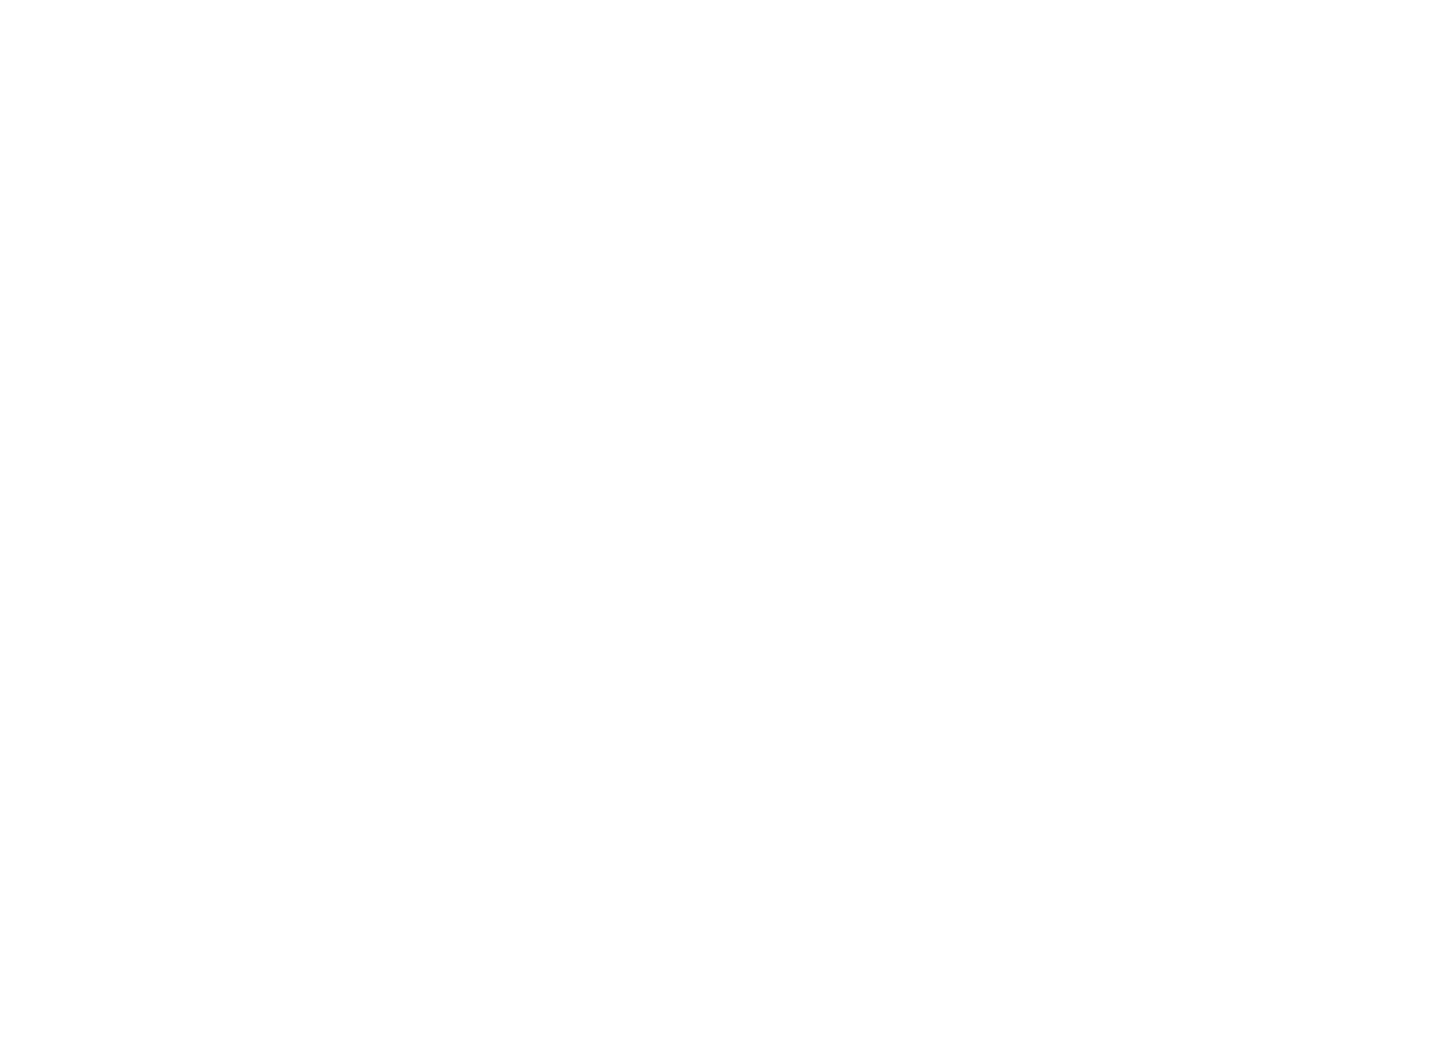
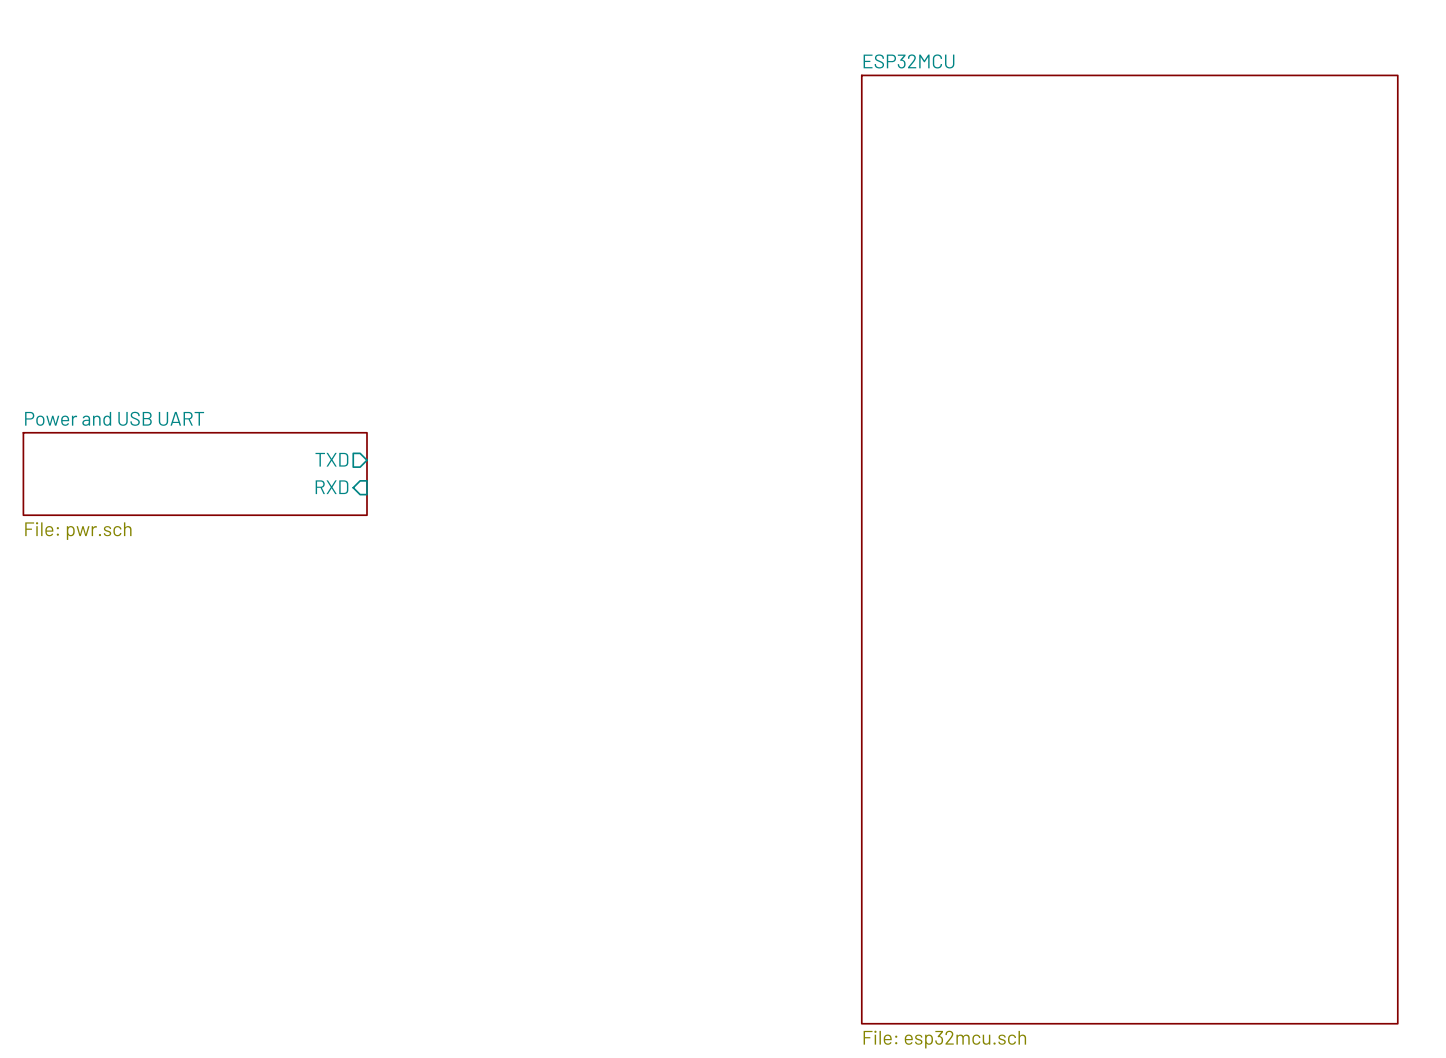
sheet pin: none -> TXD (331, 459)
sheet Power and USB UART: none -> File: pwr.sch (195, 473)
sheet pin: none -> RXD (332, 487)
sheet ESP32MCU: none -> File: esp32mcu.sch (1129, 549)

